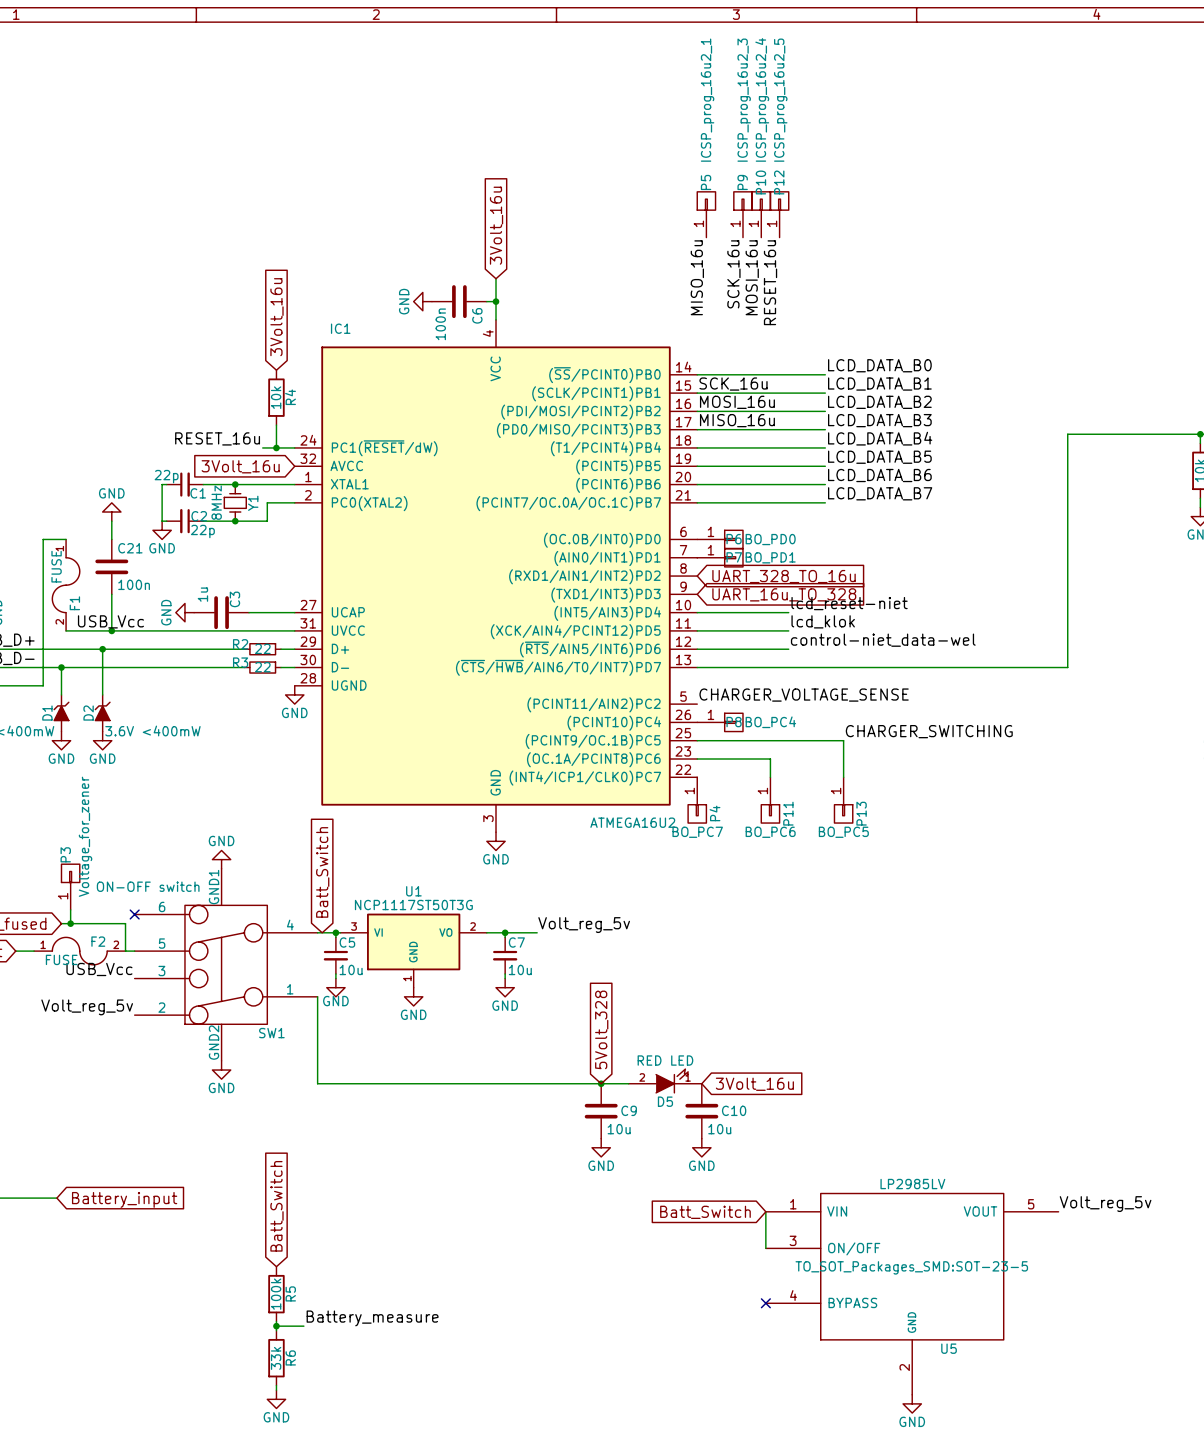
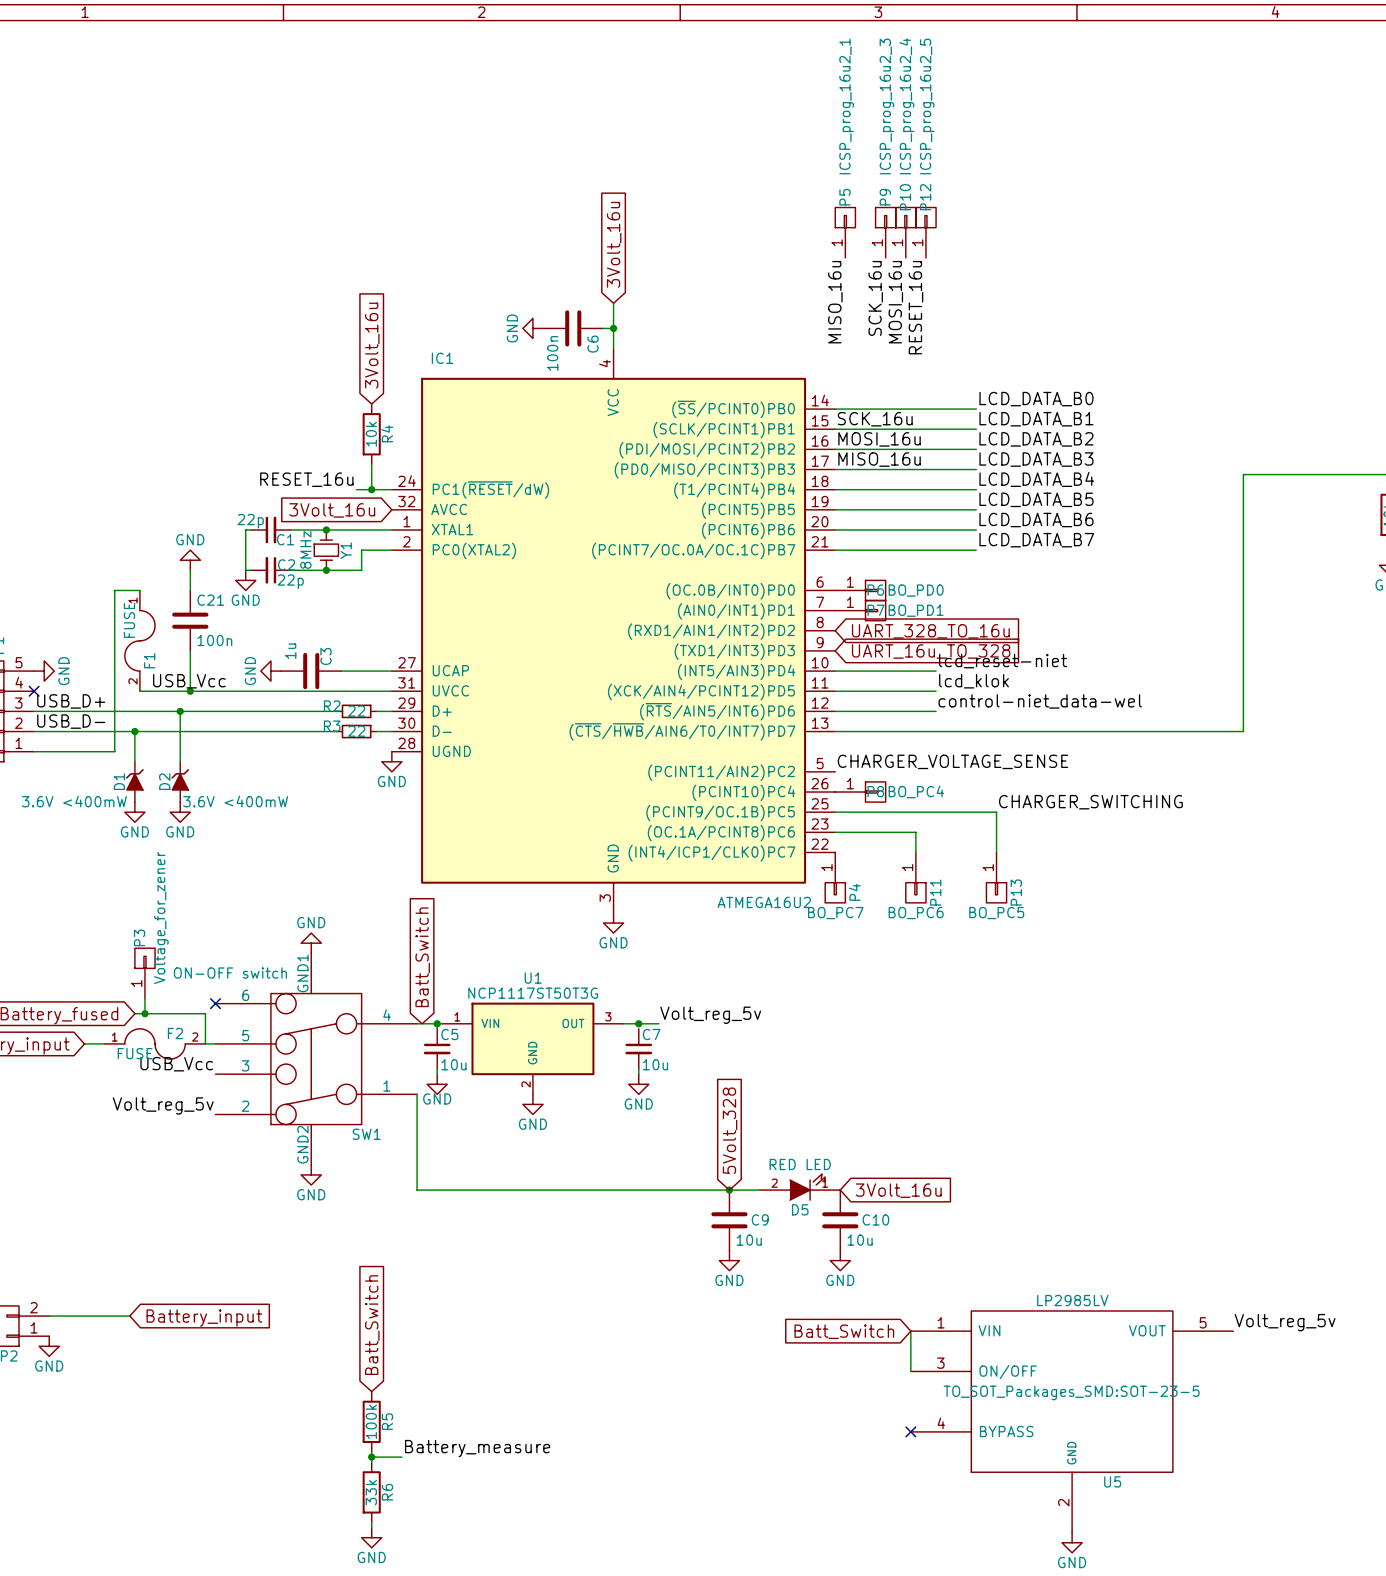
U1 symbol: [340, 913, 487, 988] -> [442, 1002, 624, 1095]
junction position: (505, 932) -> (638, 1023)
C7 position: (505, 955) -> (638, 1048)
wire: (505, 973) (505, 978) -> (638, 1069) (638, 1074)
power symbol position: GND (505, 987) -> GND (638, 1084)
power symbol position: GND (413, 996) -> GND (532, 1104)

